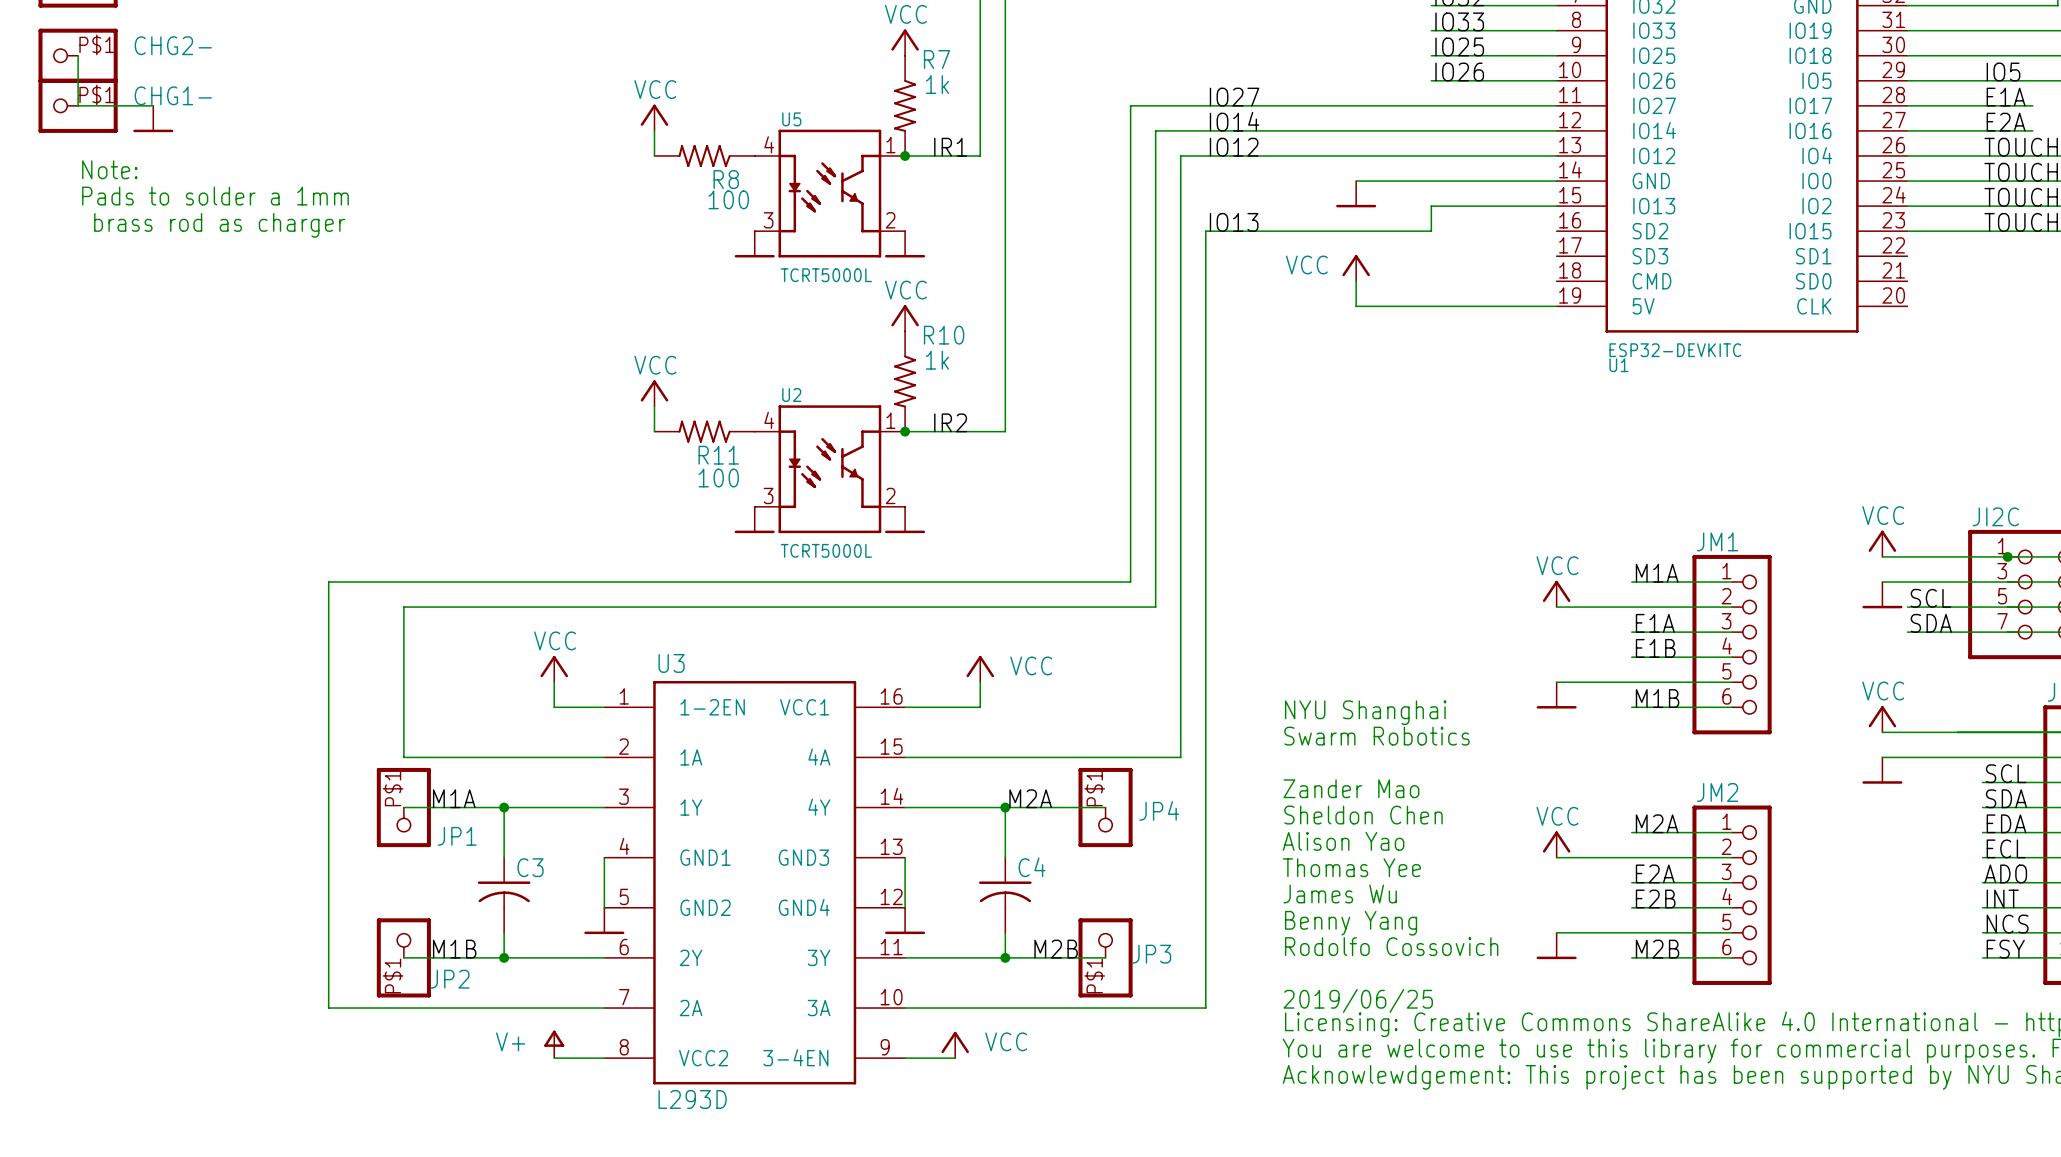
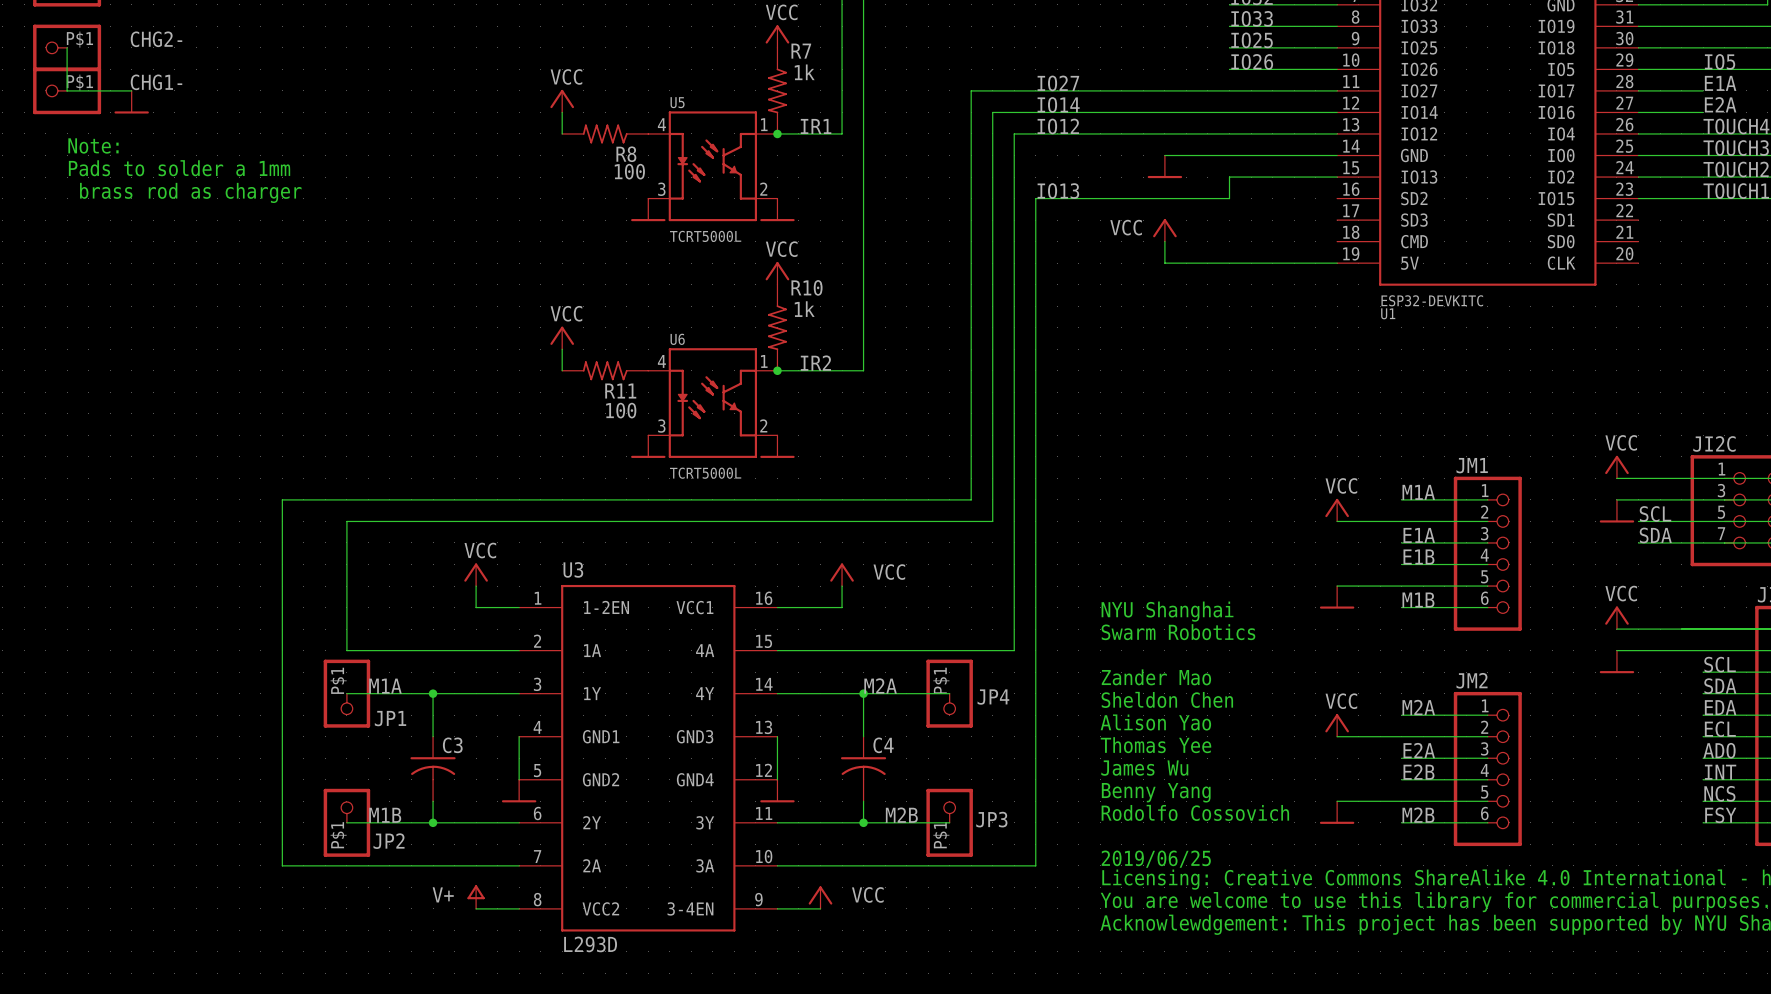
wire: (1982, 105) (2032, 105) -> none
wire: (1982, 130) (2032, 130) -> none
U2 name: U2 (791, 395) -> U6 (677, 339)
junction: (2007, 556) -> none

